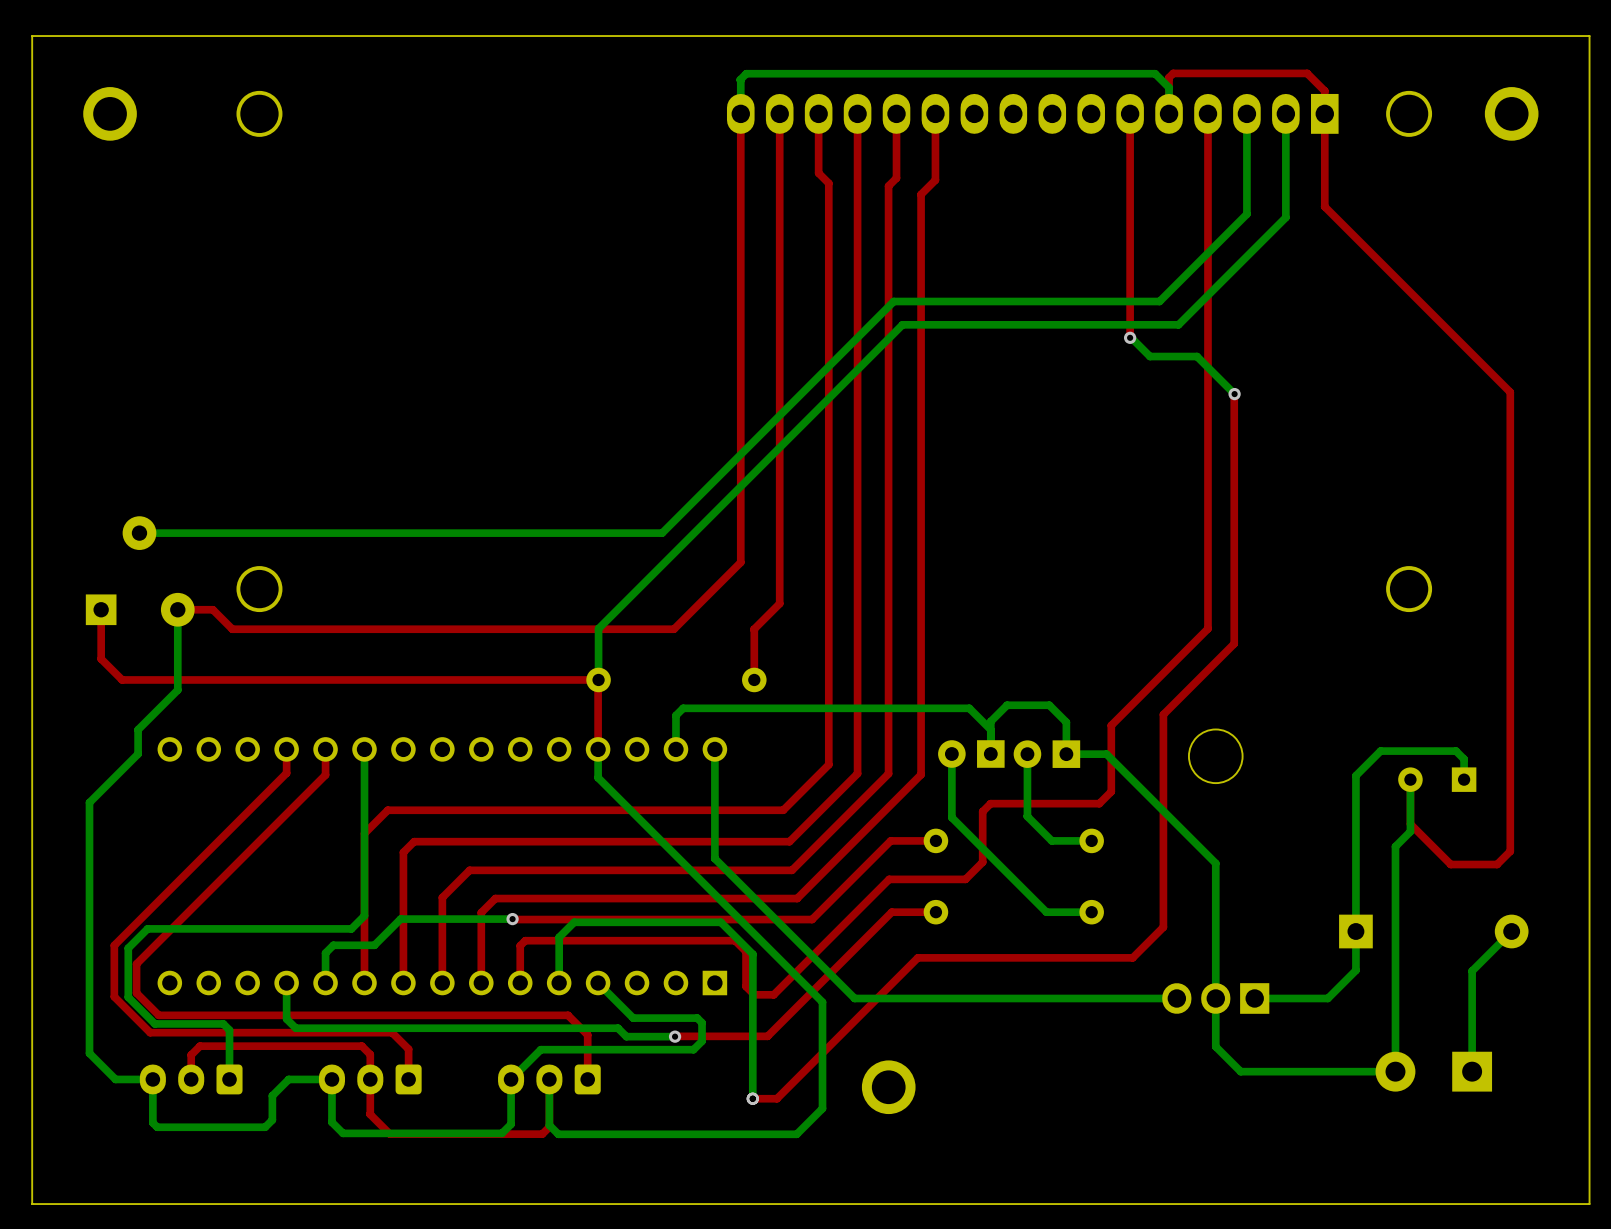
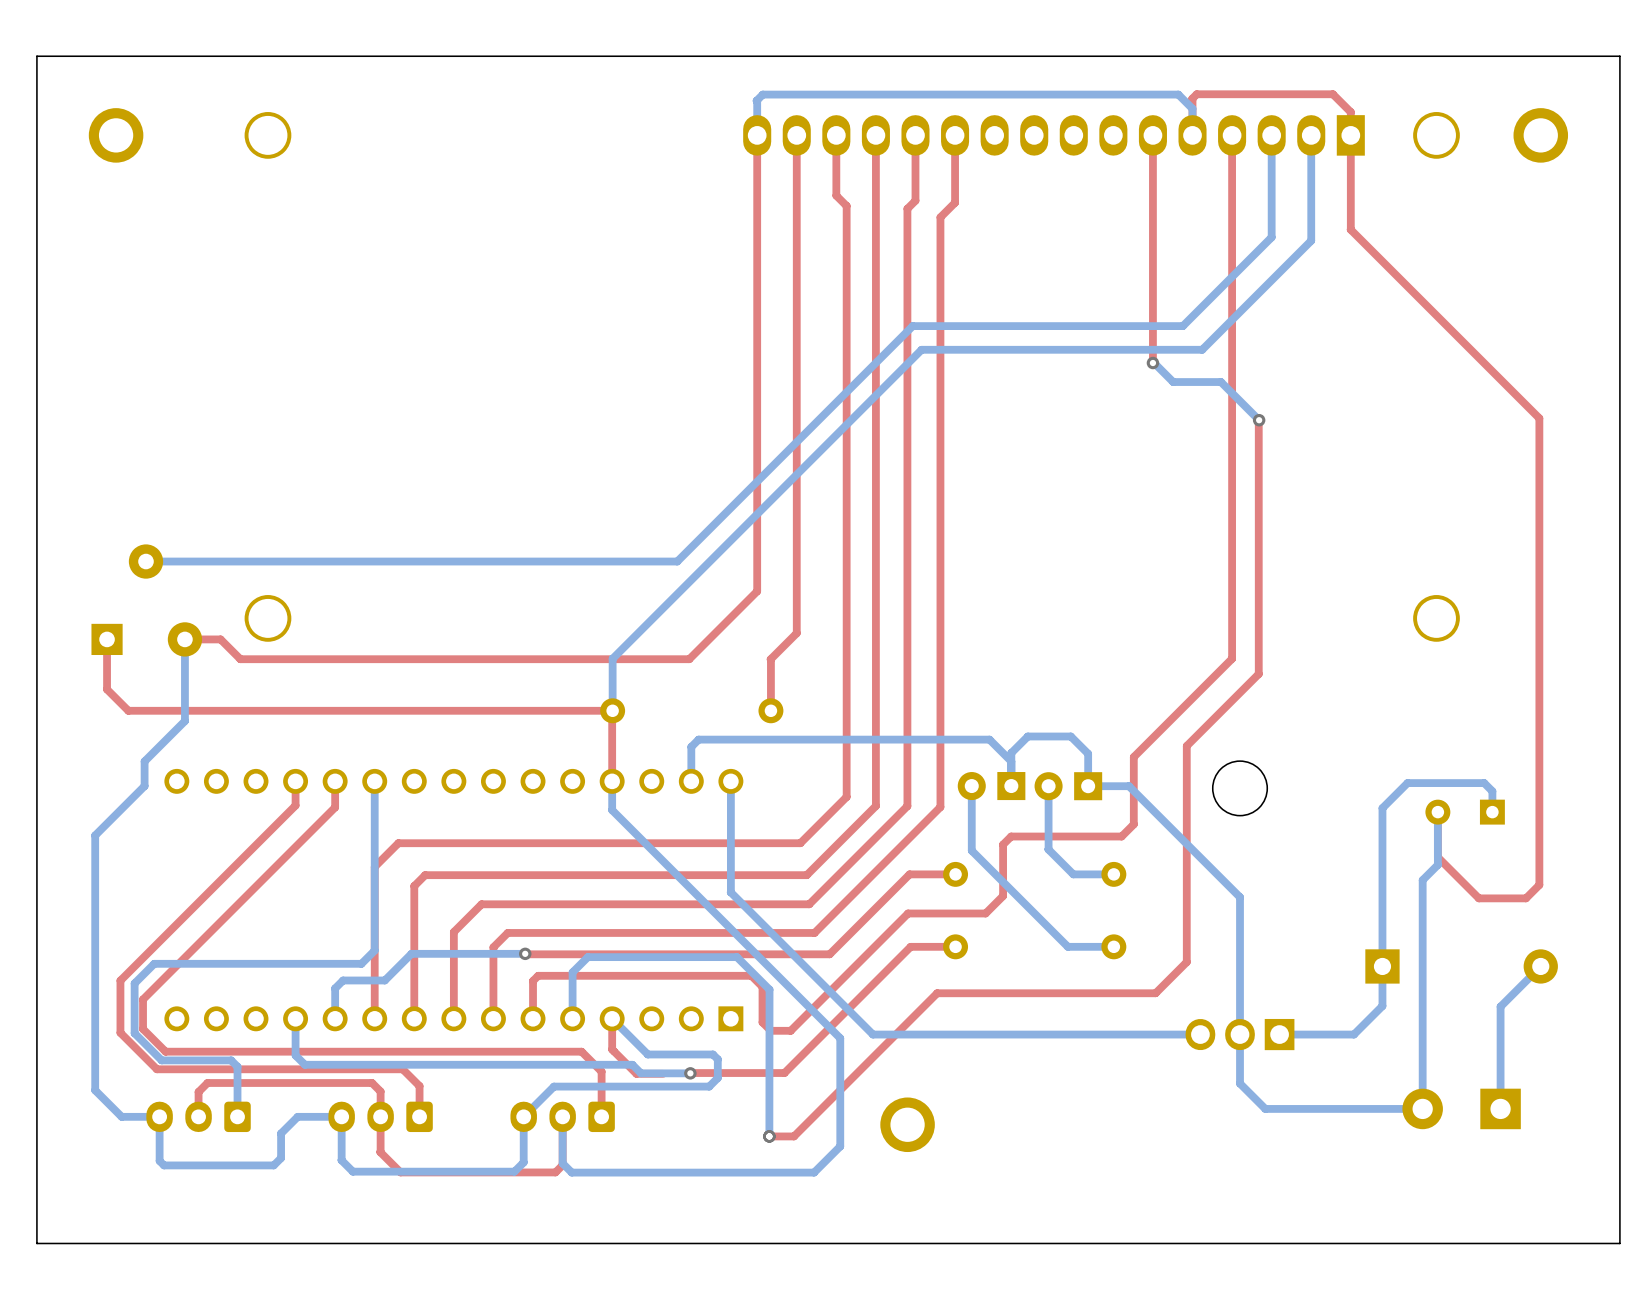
top track: none -> (612, 1018) (612, 1049) (636, 1073) (663, 1073)

